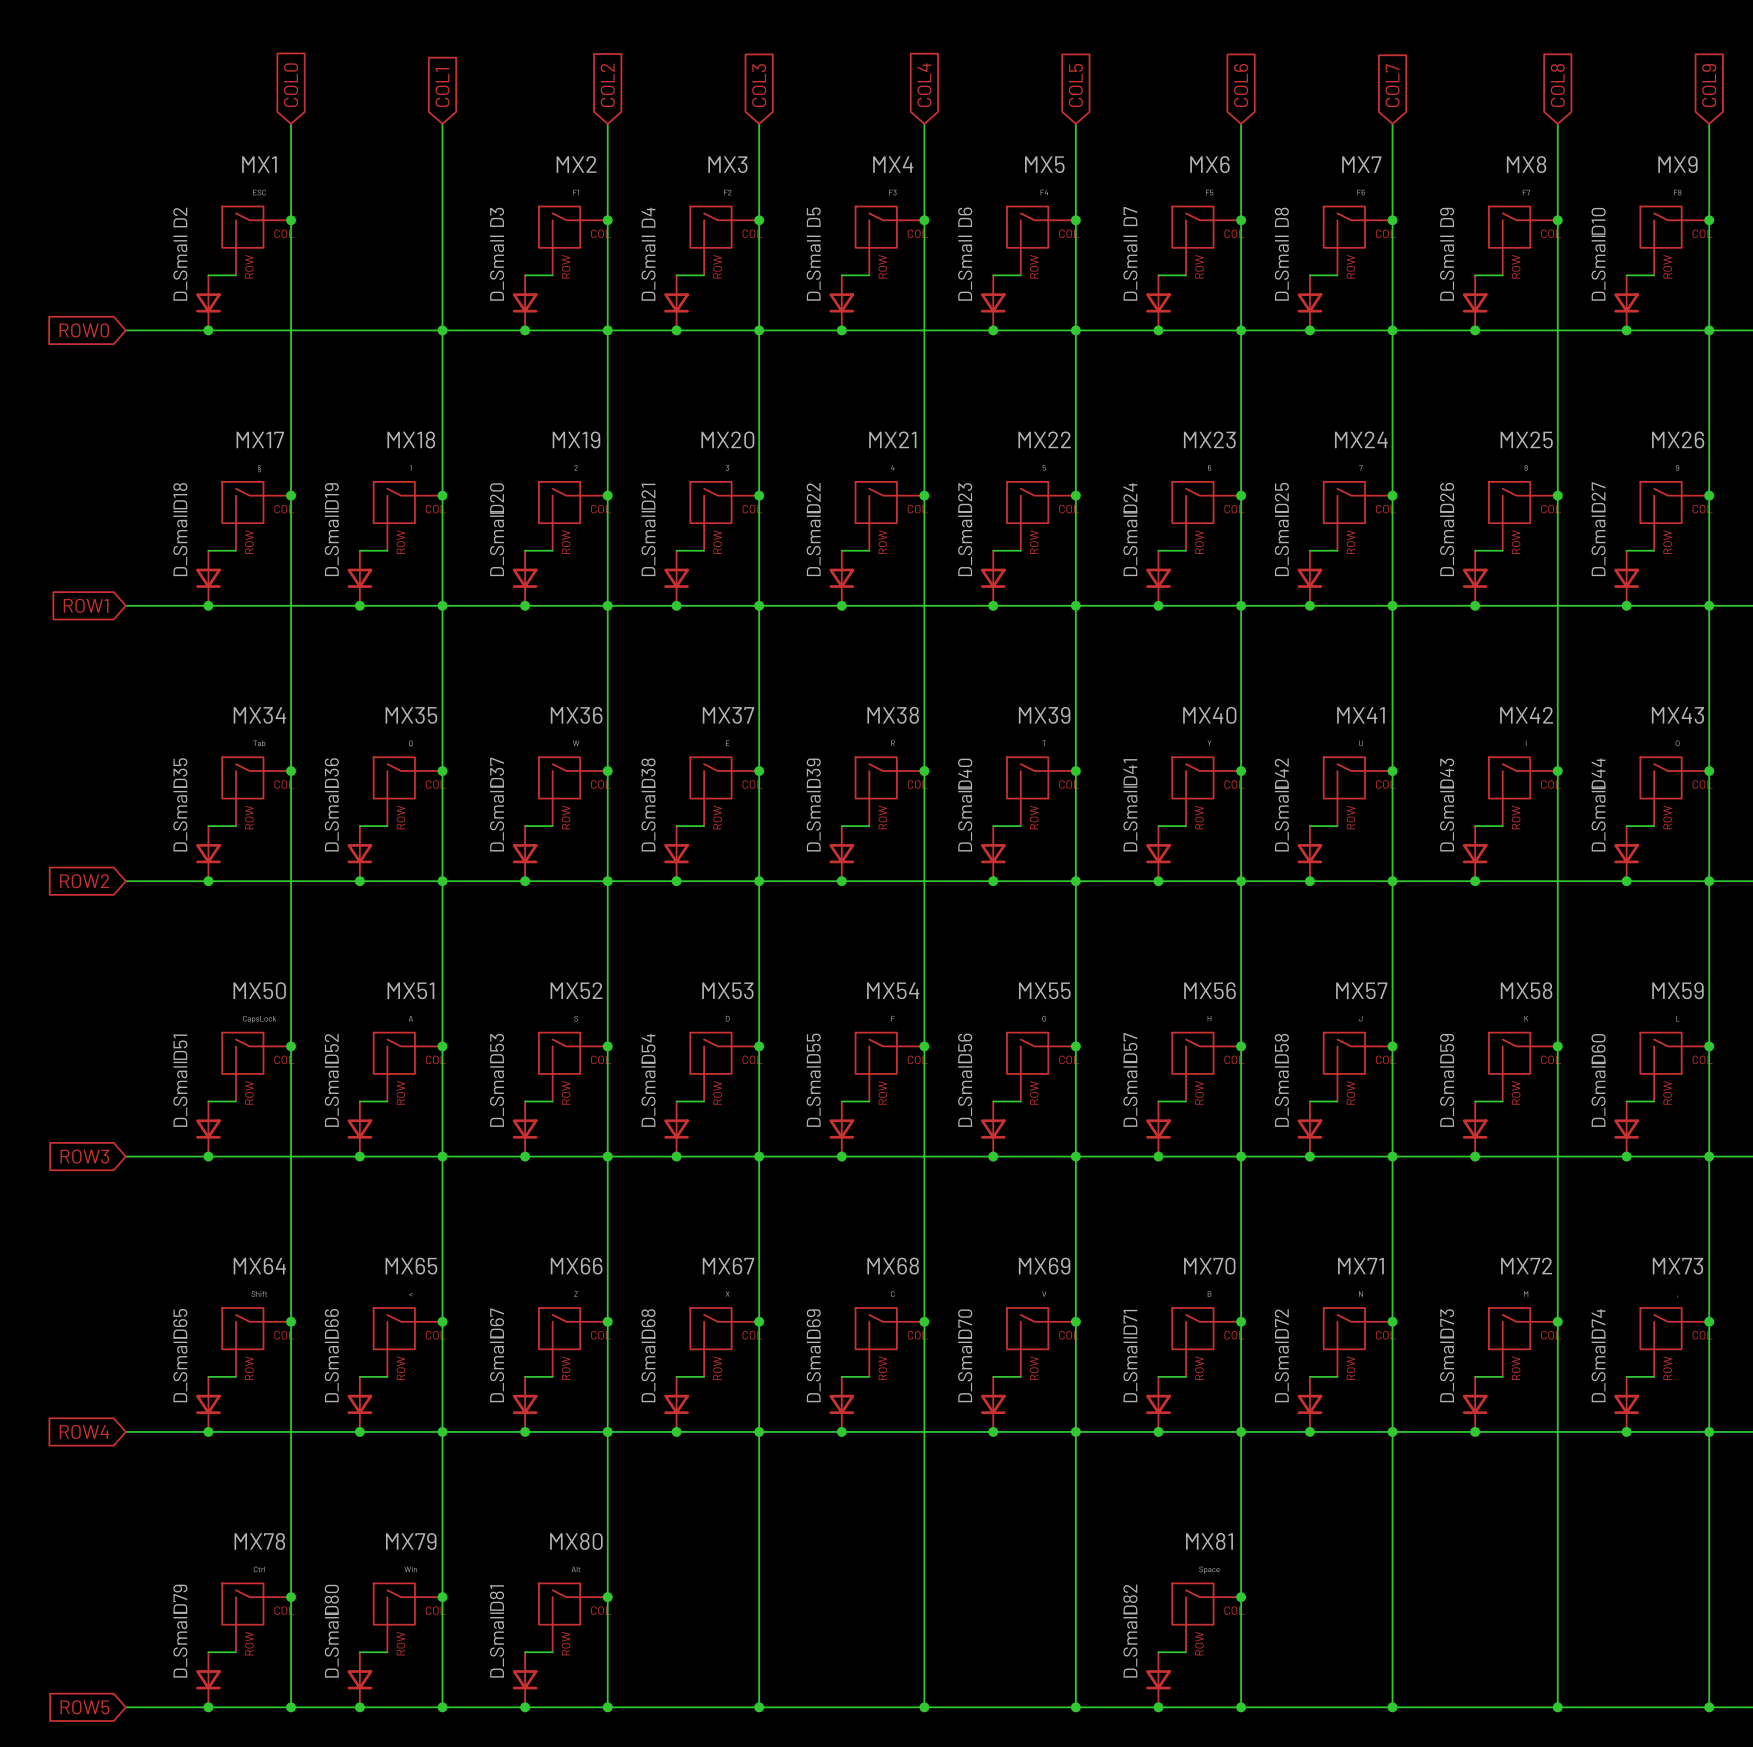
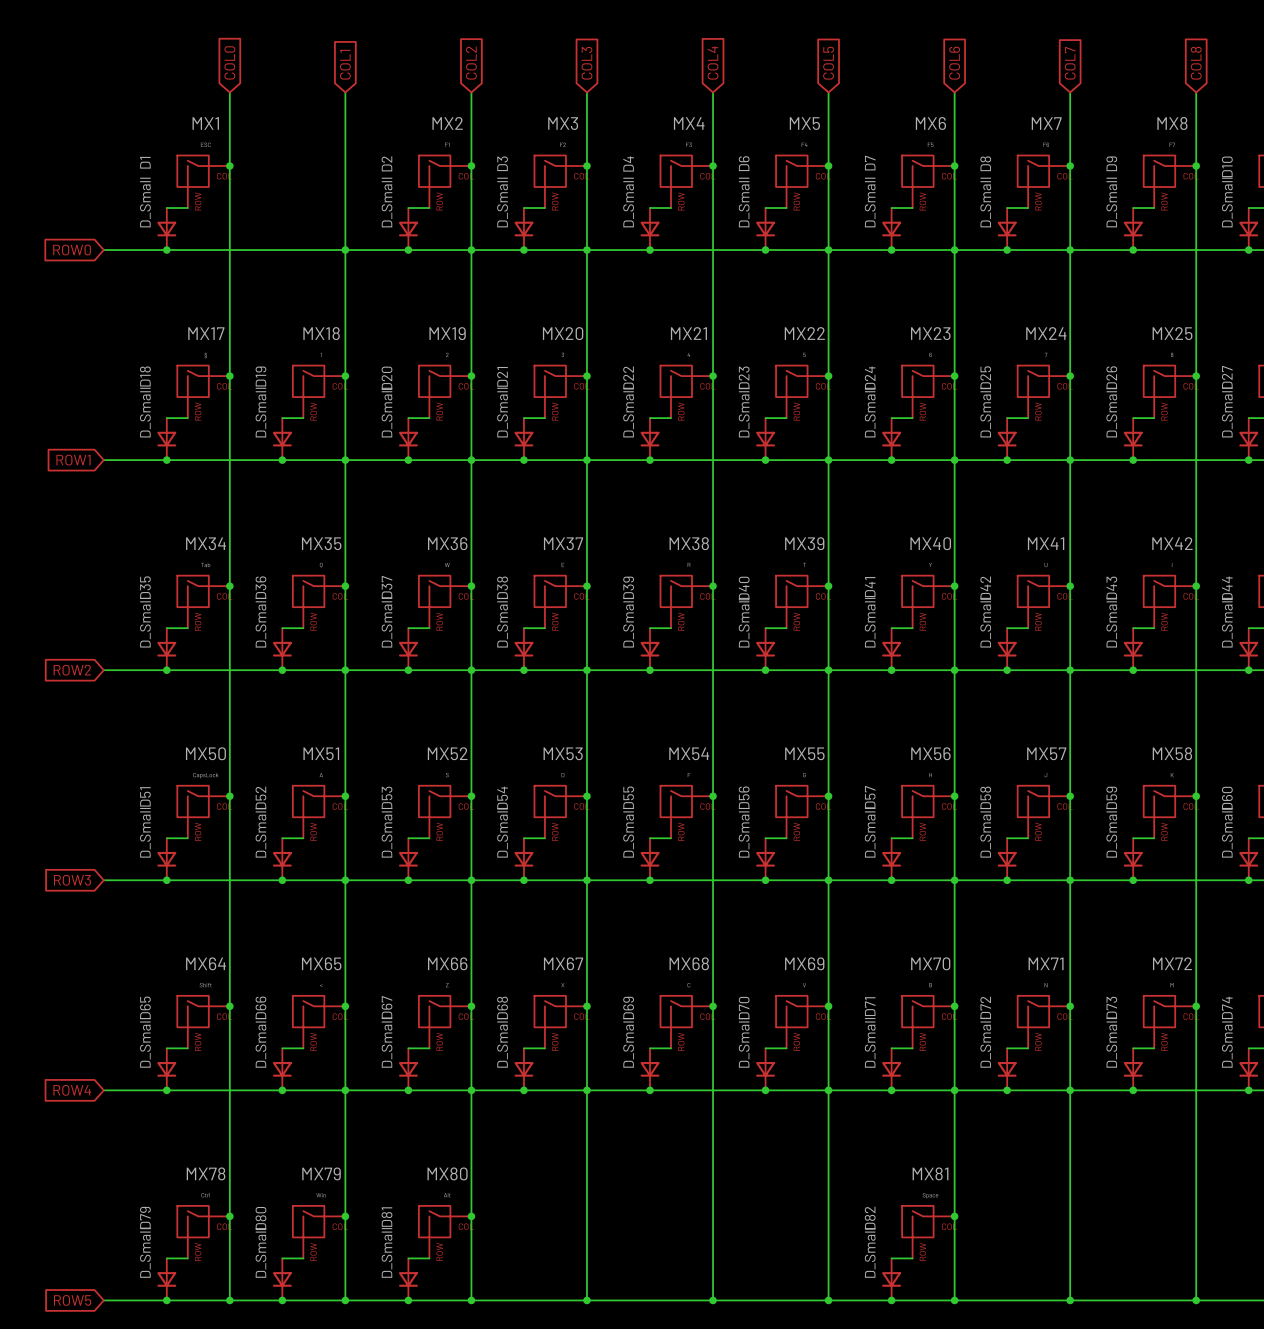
D2 name: D2 (180, 217) -> D1 (145, 162)
D3 name: D3 (497, 217) -> D2 (386, 163)
D4 name: D4 (648, 217) -> D3 (502, 163)
D5 name: D5 (813, 217) -> D4 (628, 164)

